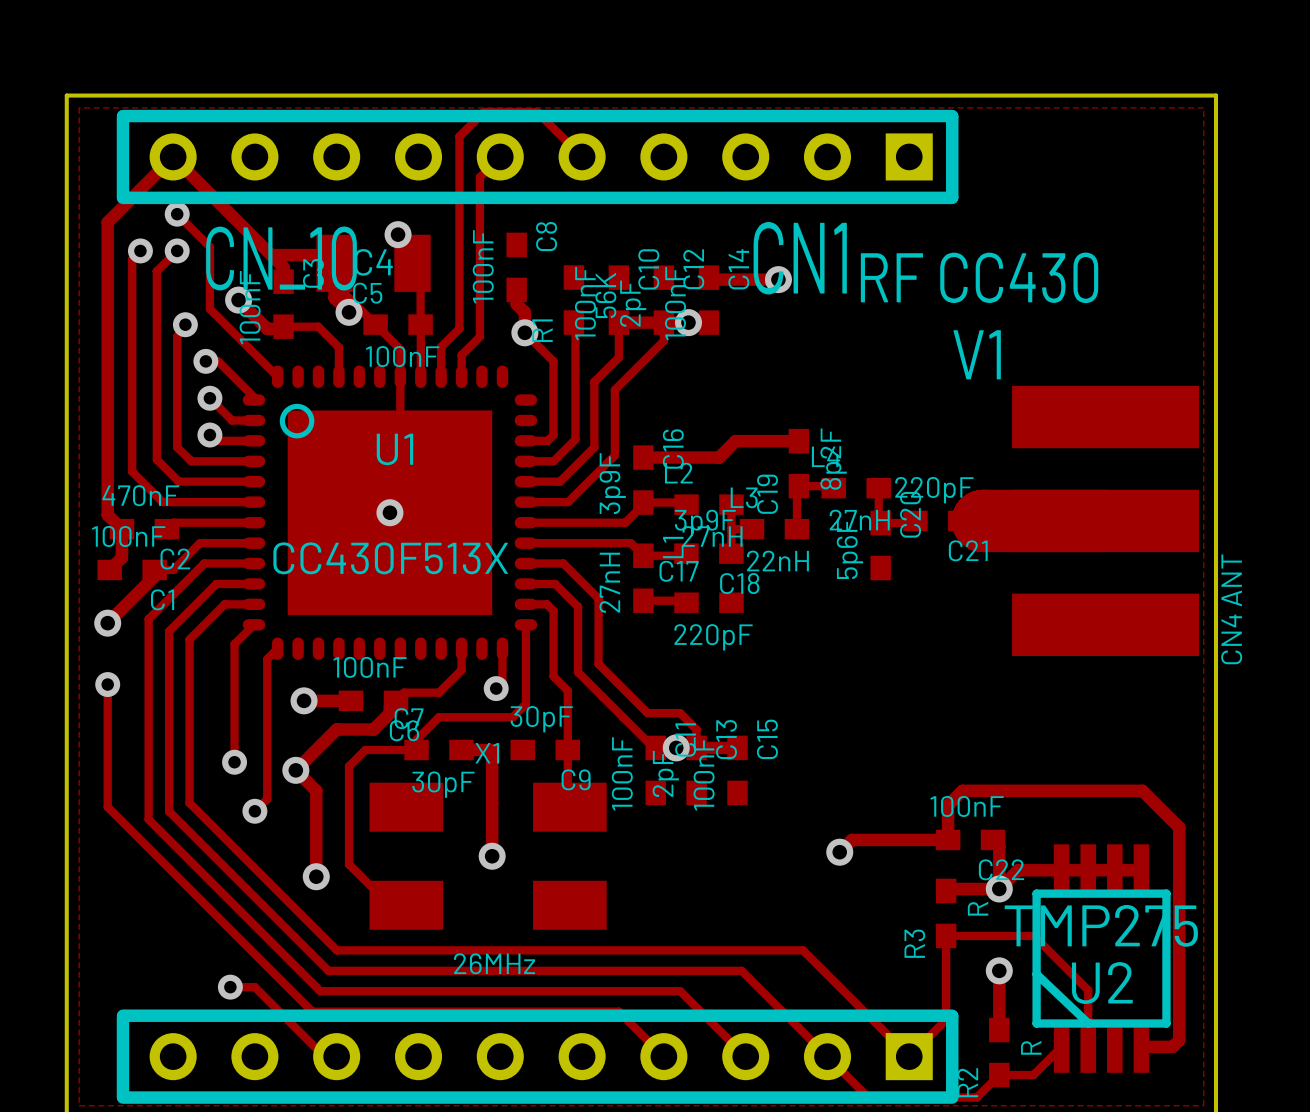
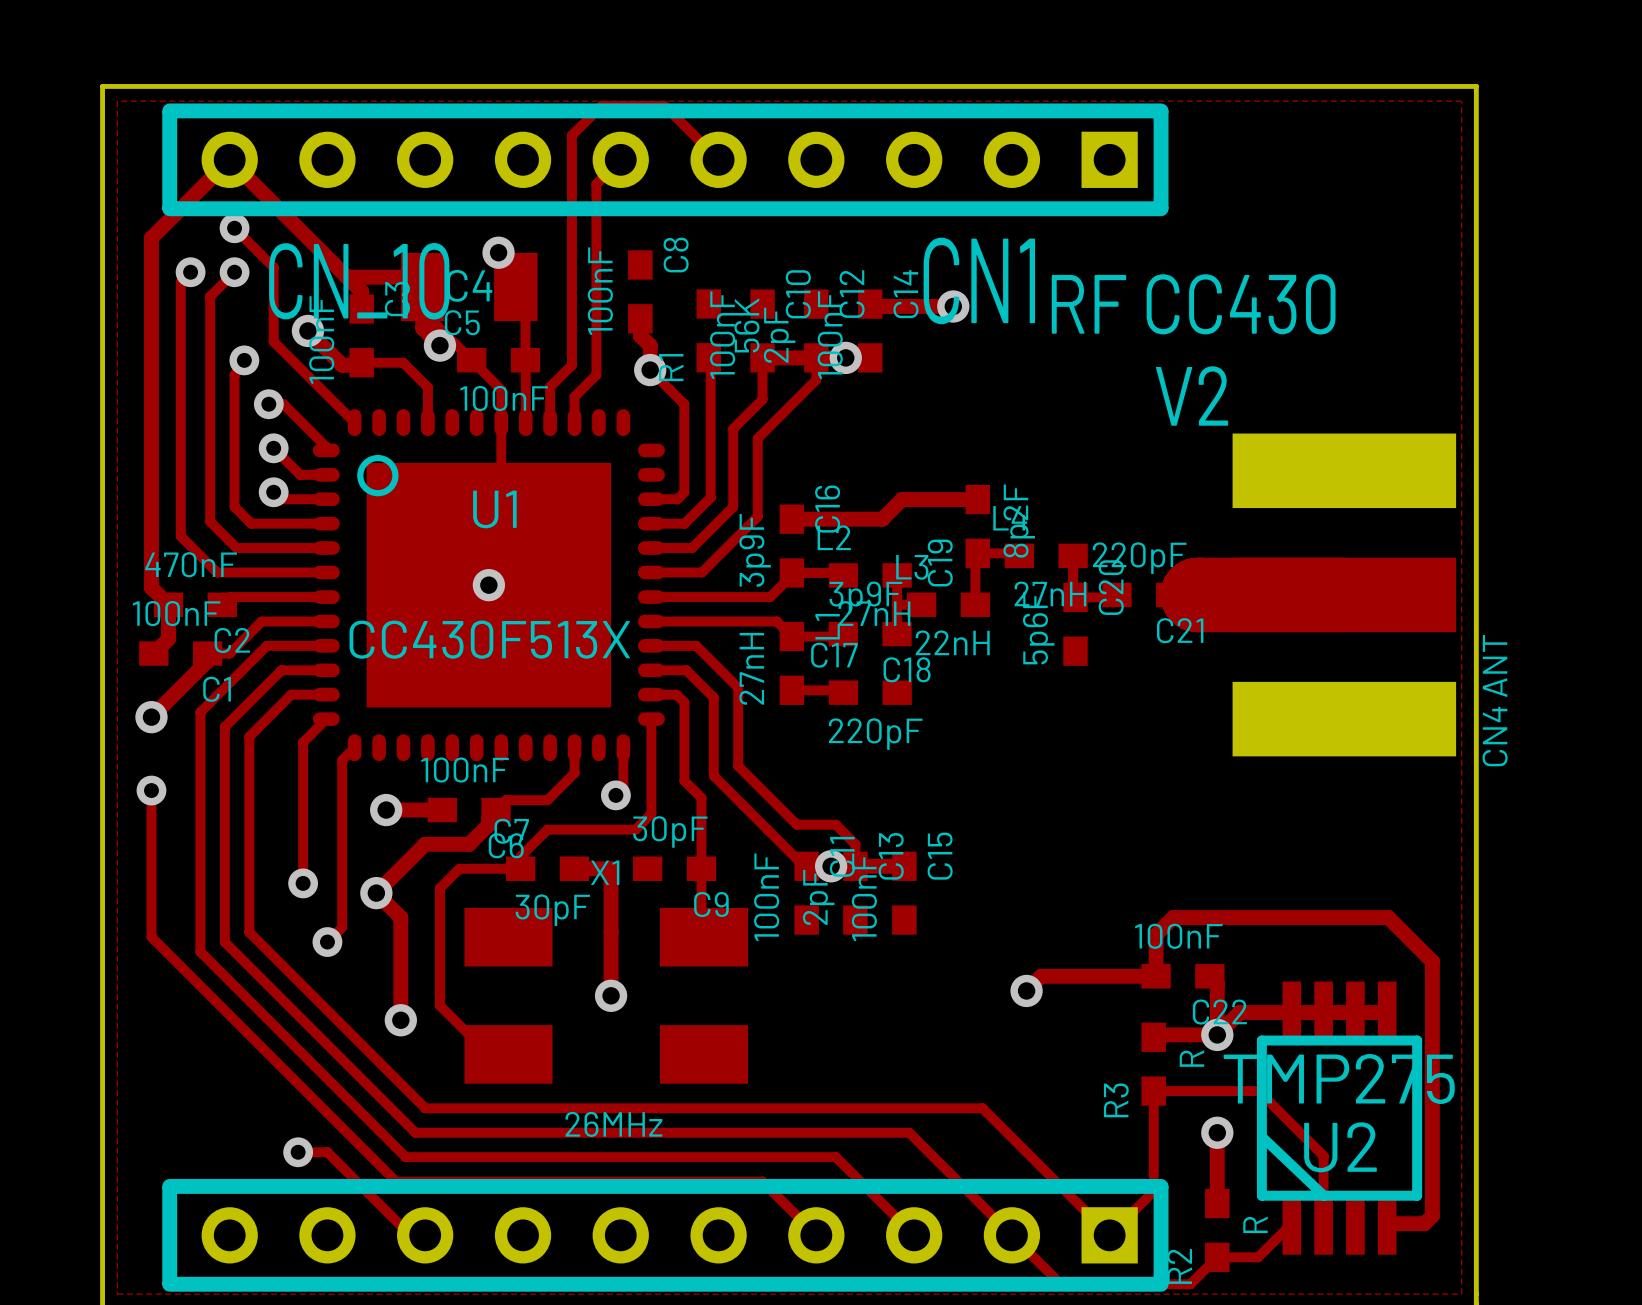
text: V1 (977, 354) -> V2 (1192, 396)
CN4 footprint: [1012, 385, 1200, 656] -> [1232, 433, 1457, 757]

